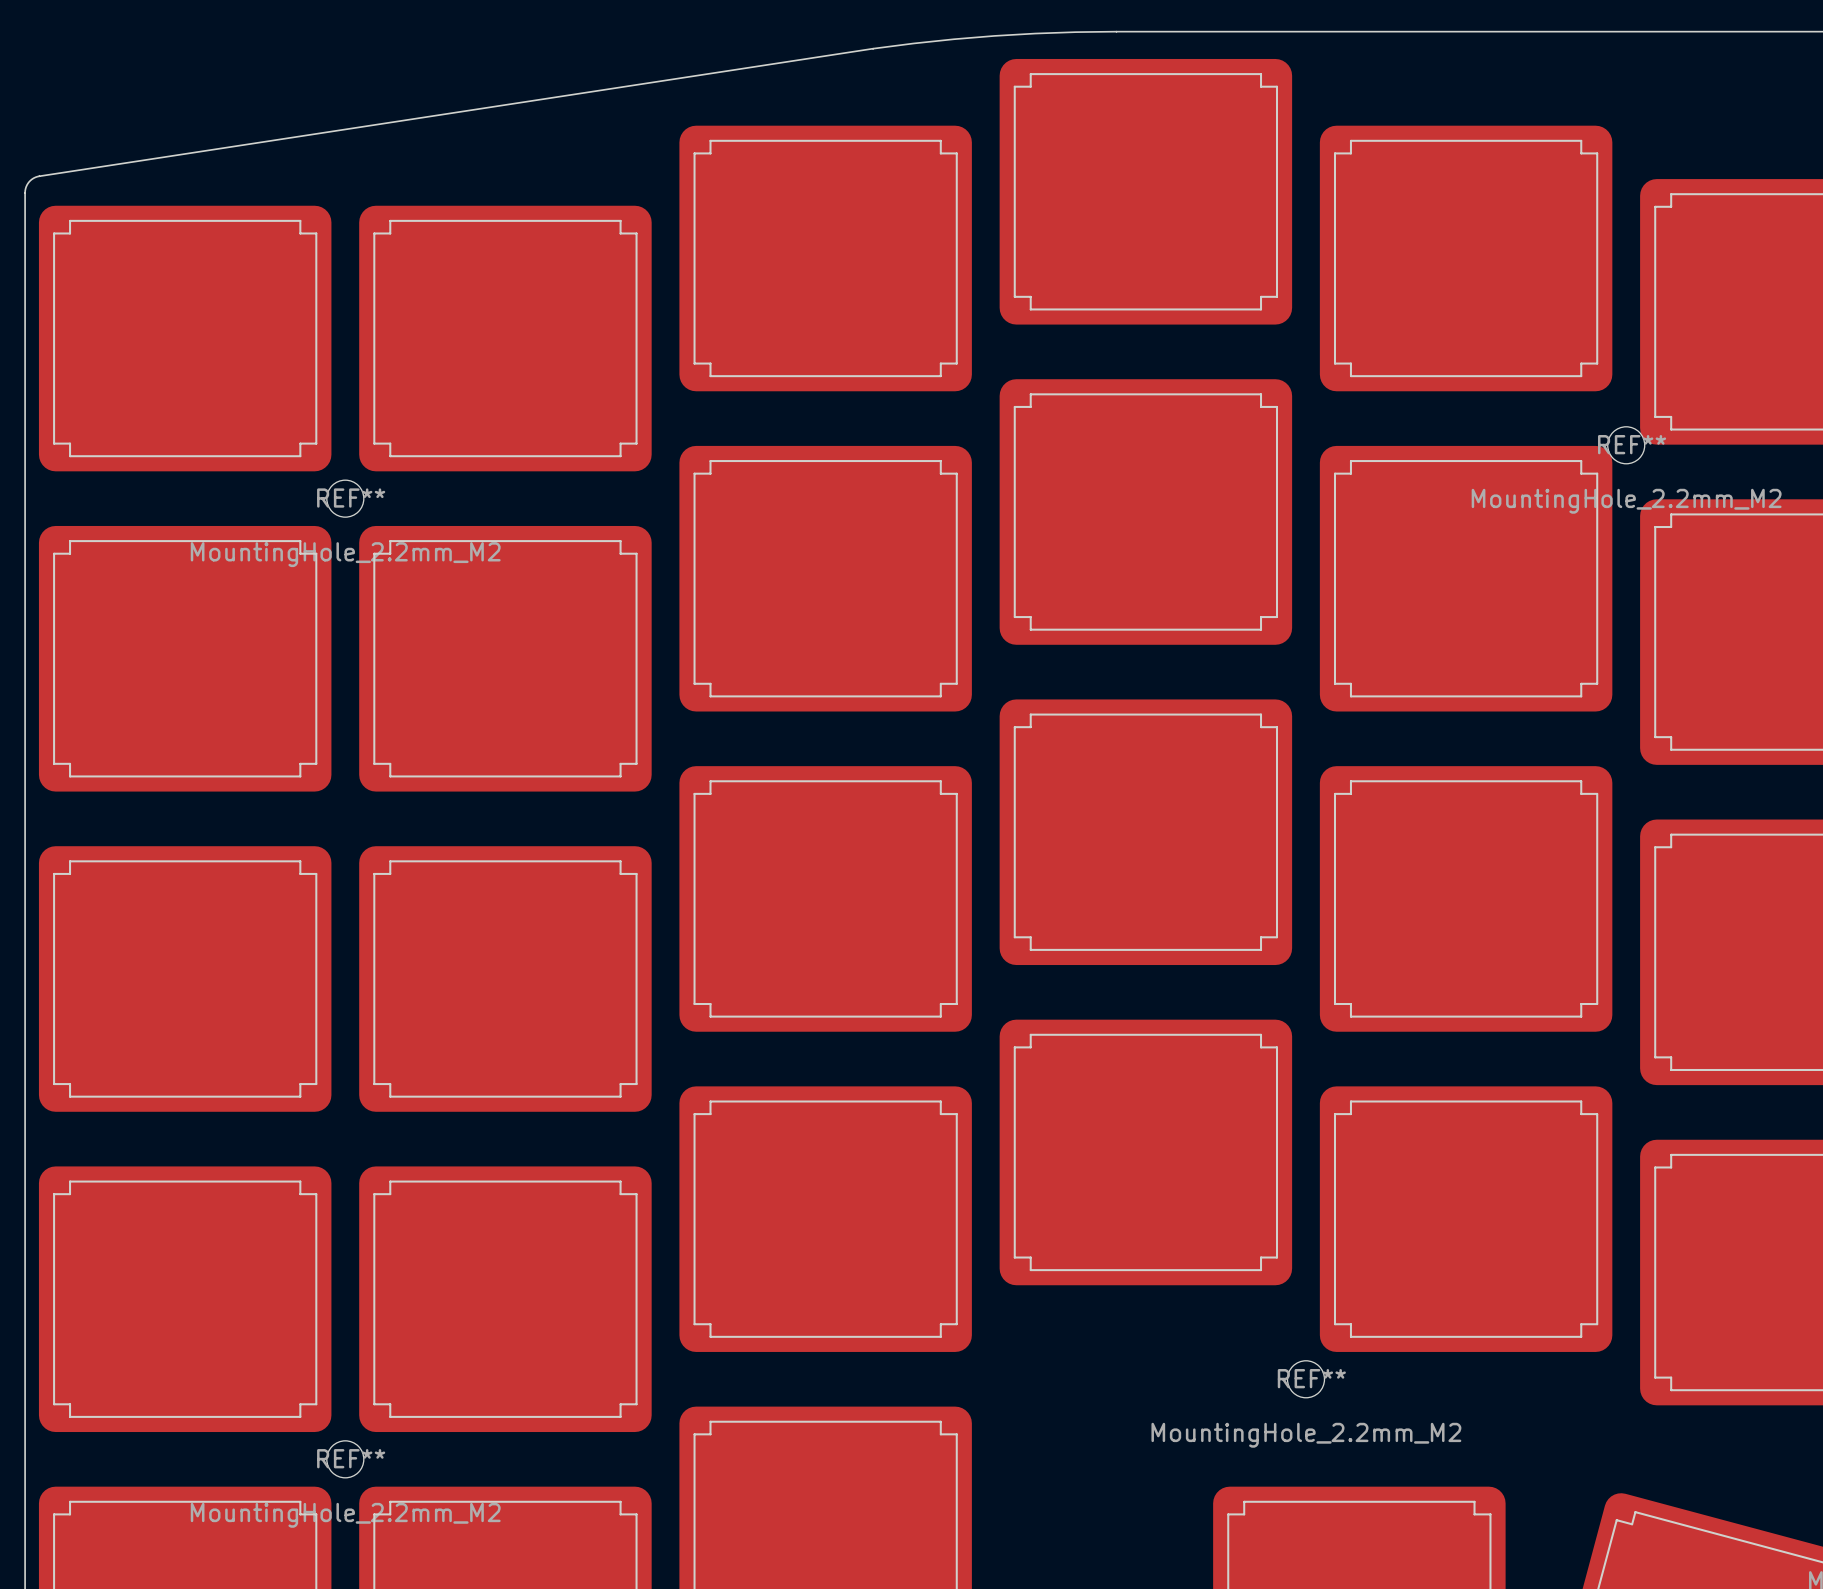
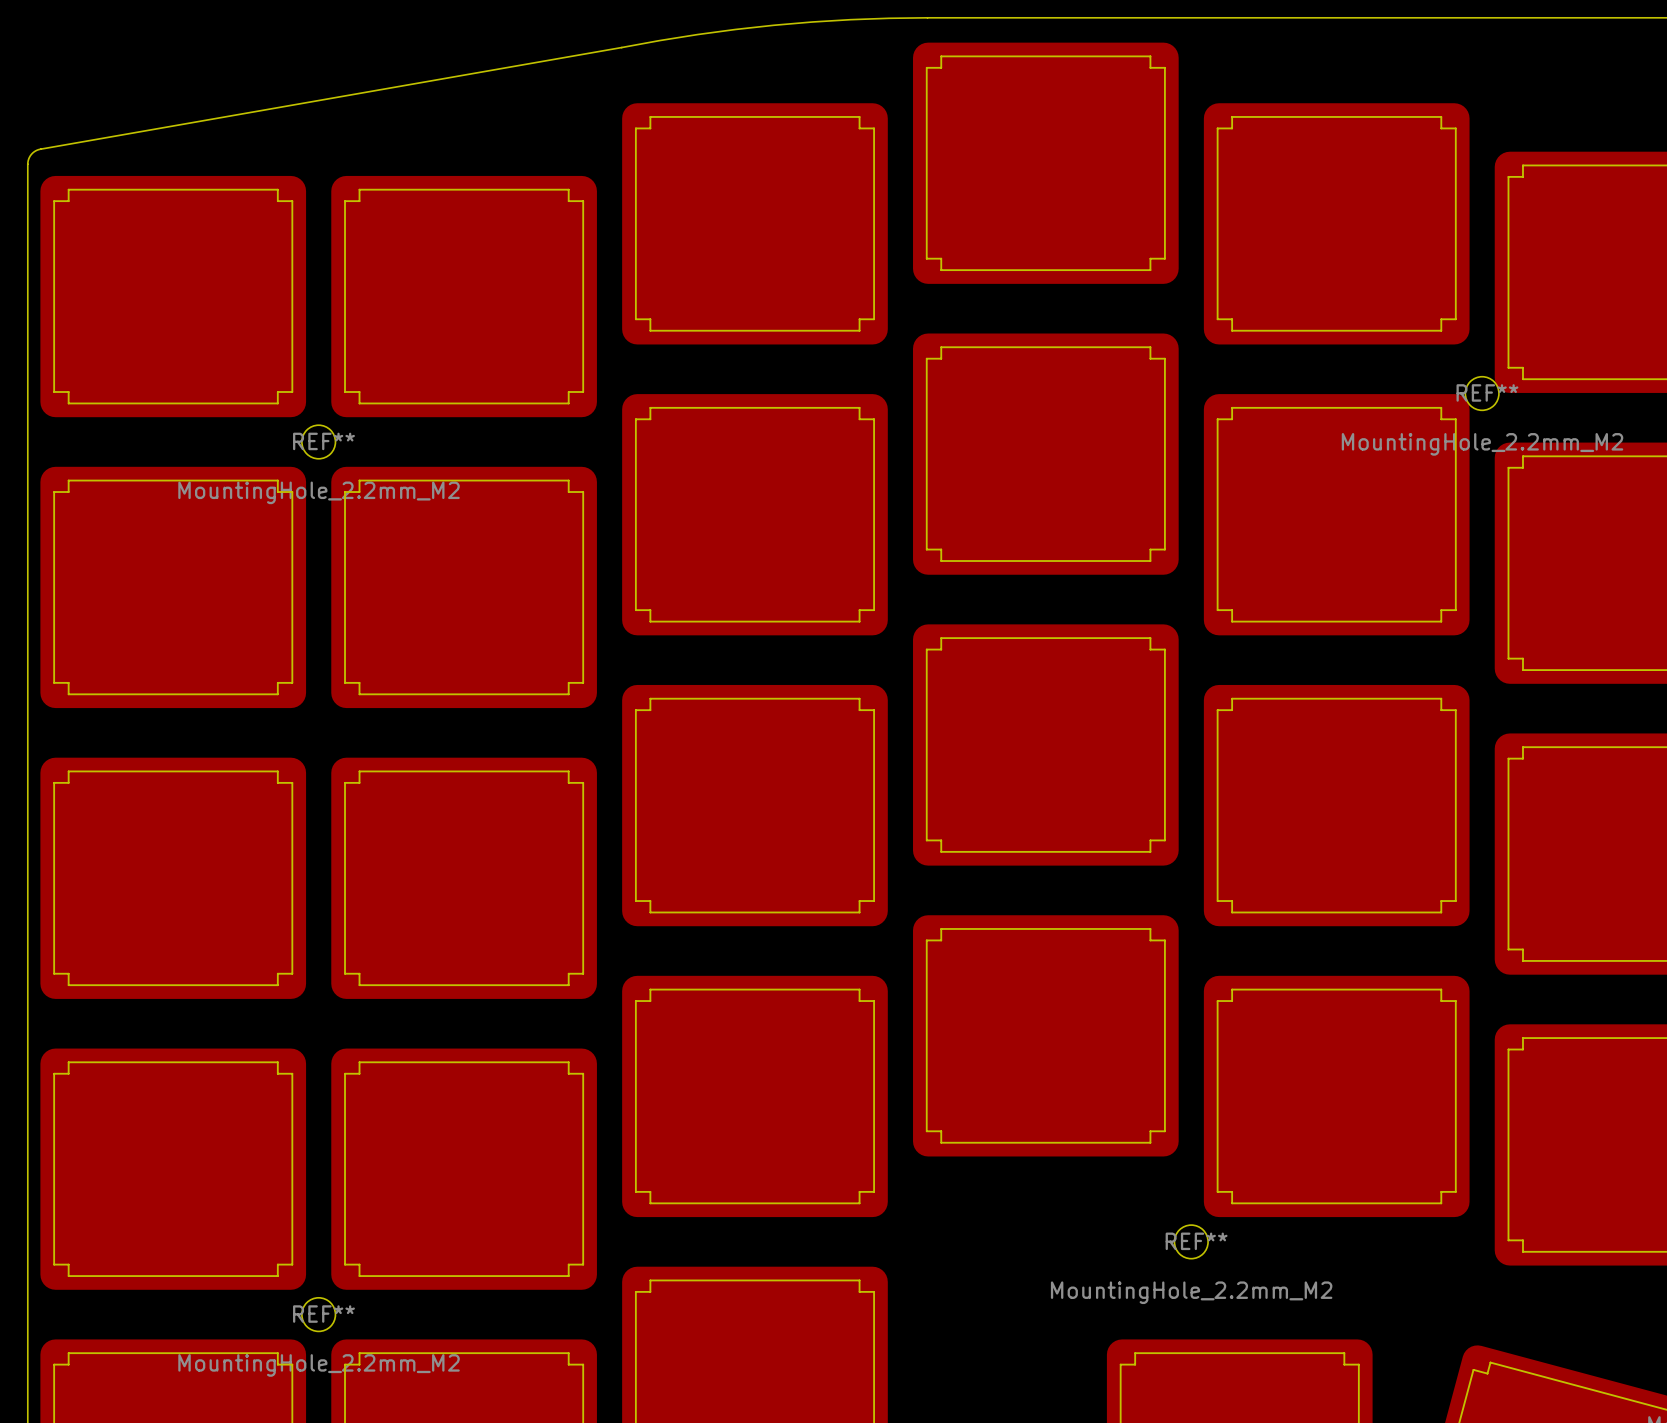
board edge: (1116, 31) (994, 35) (873, 48) (39, 176) -> (1019, 17) (850, 19) (773, 25) (697, 34) (40, 149)

